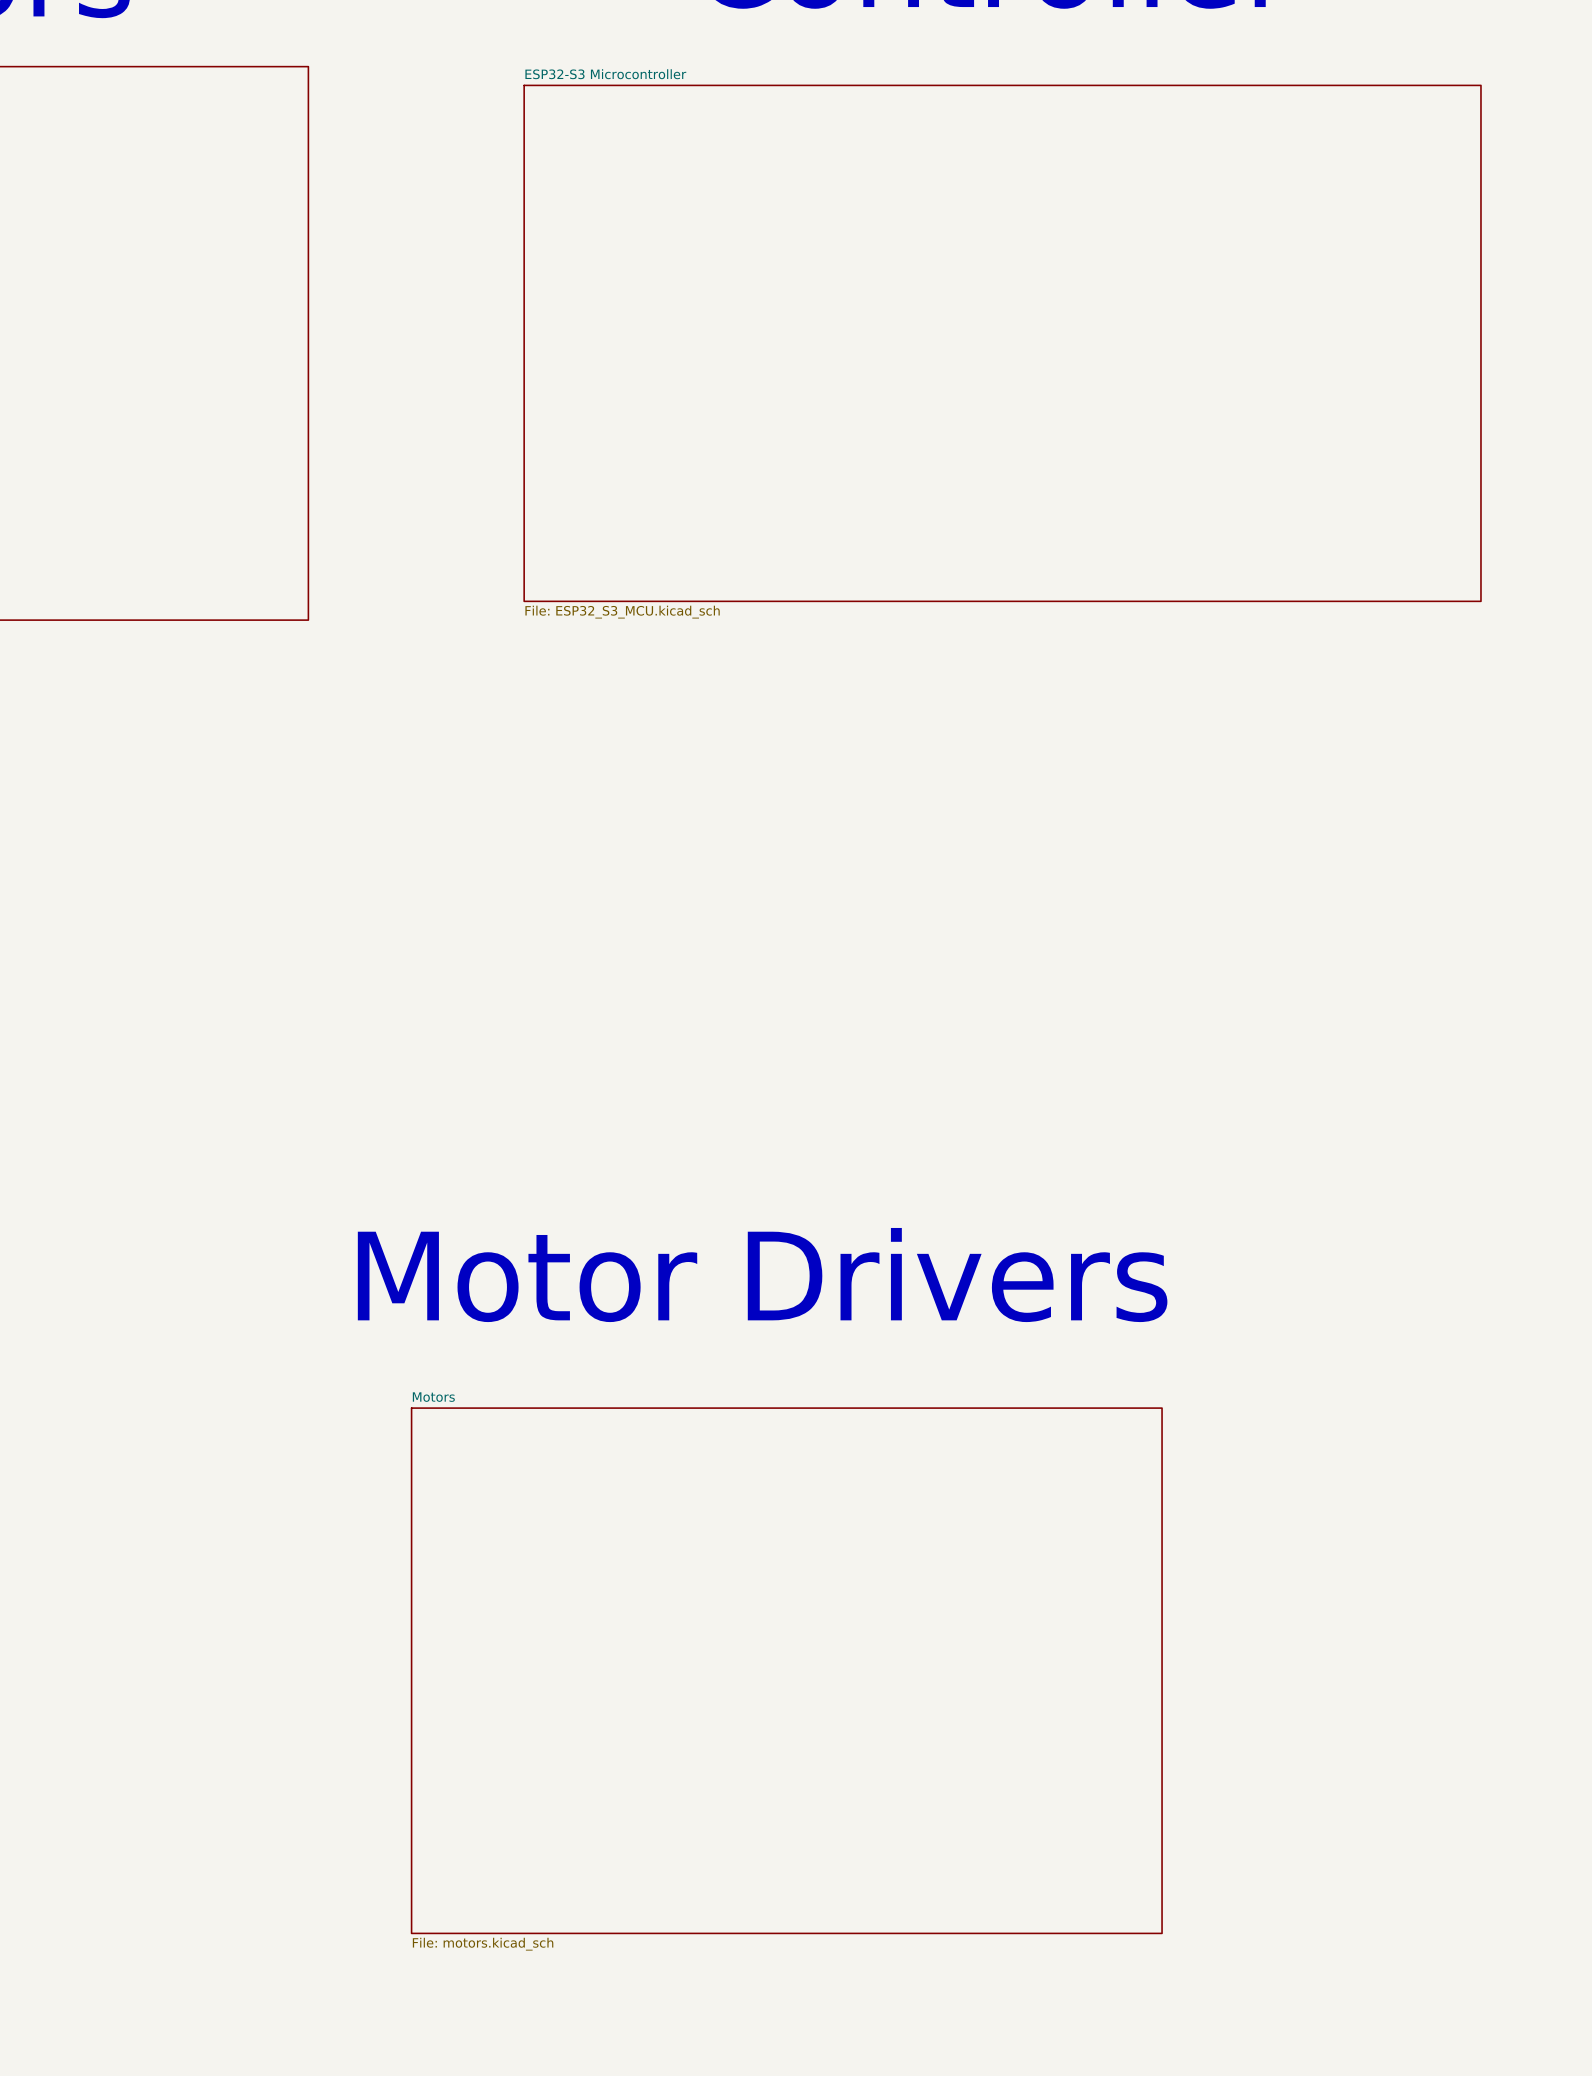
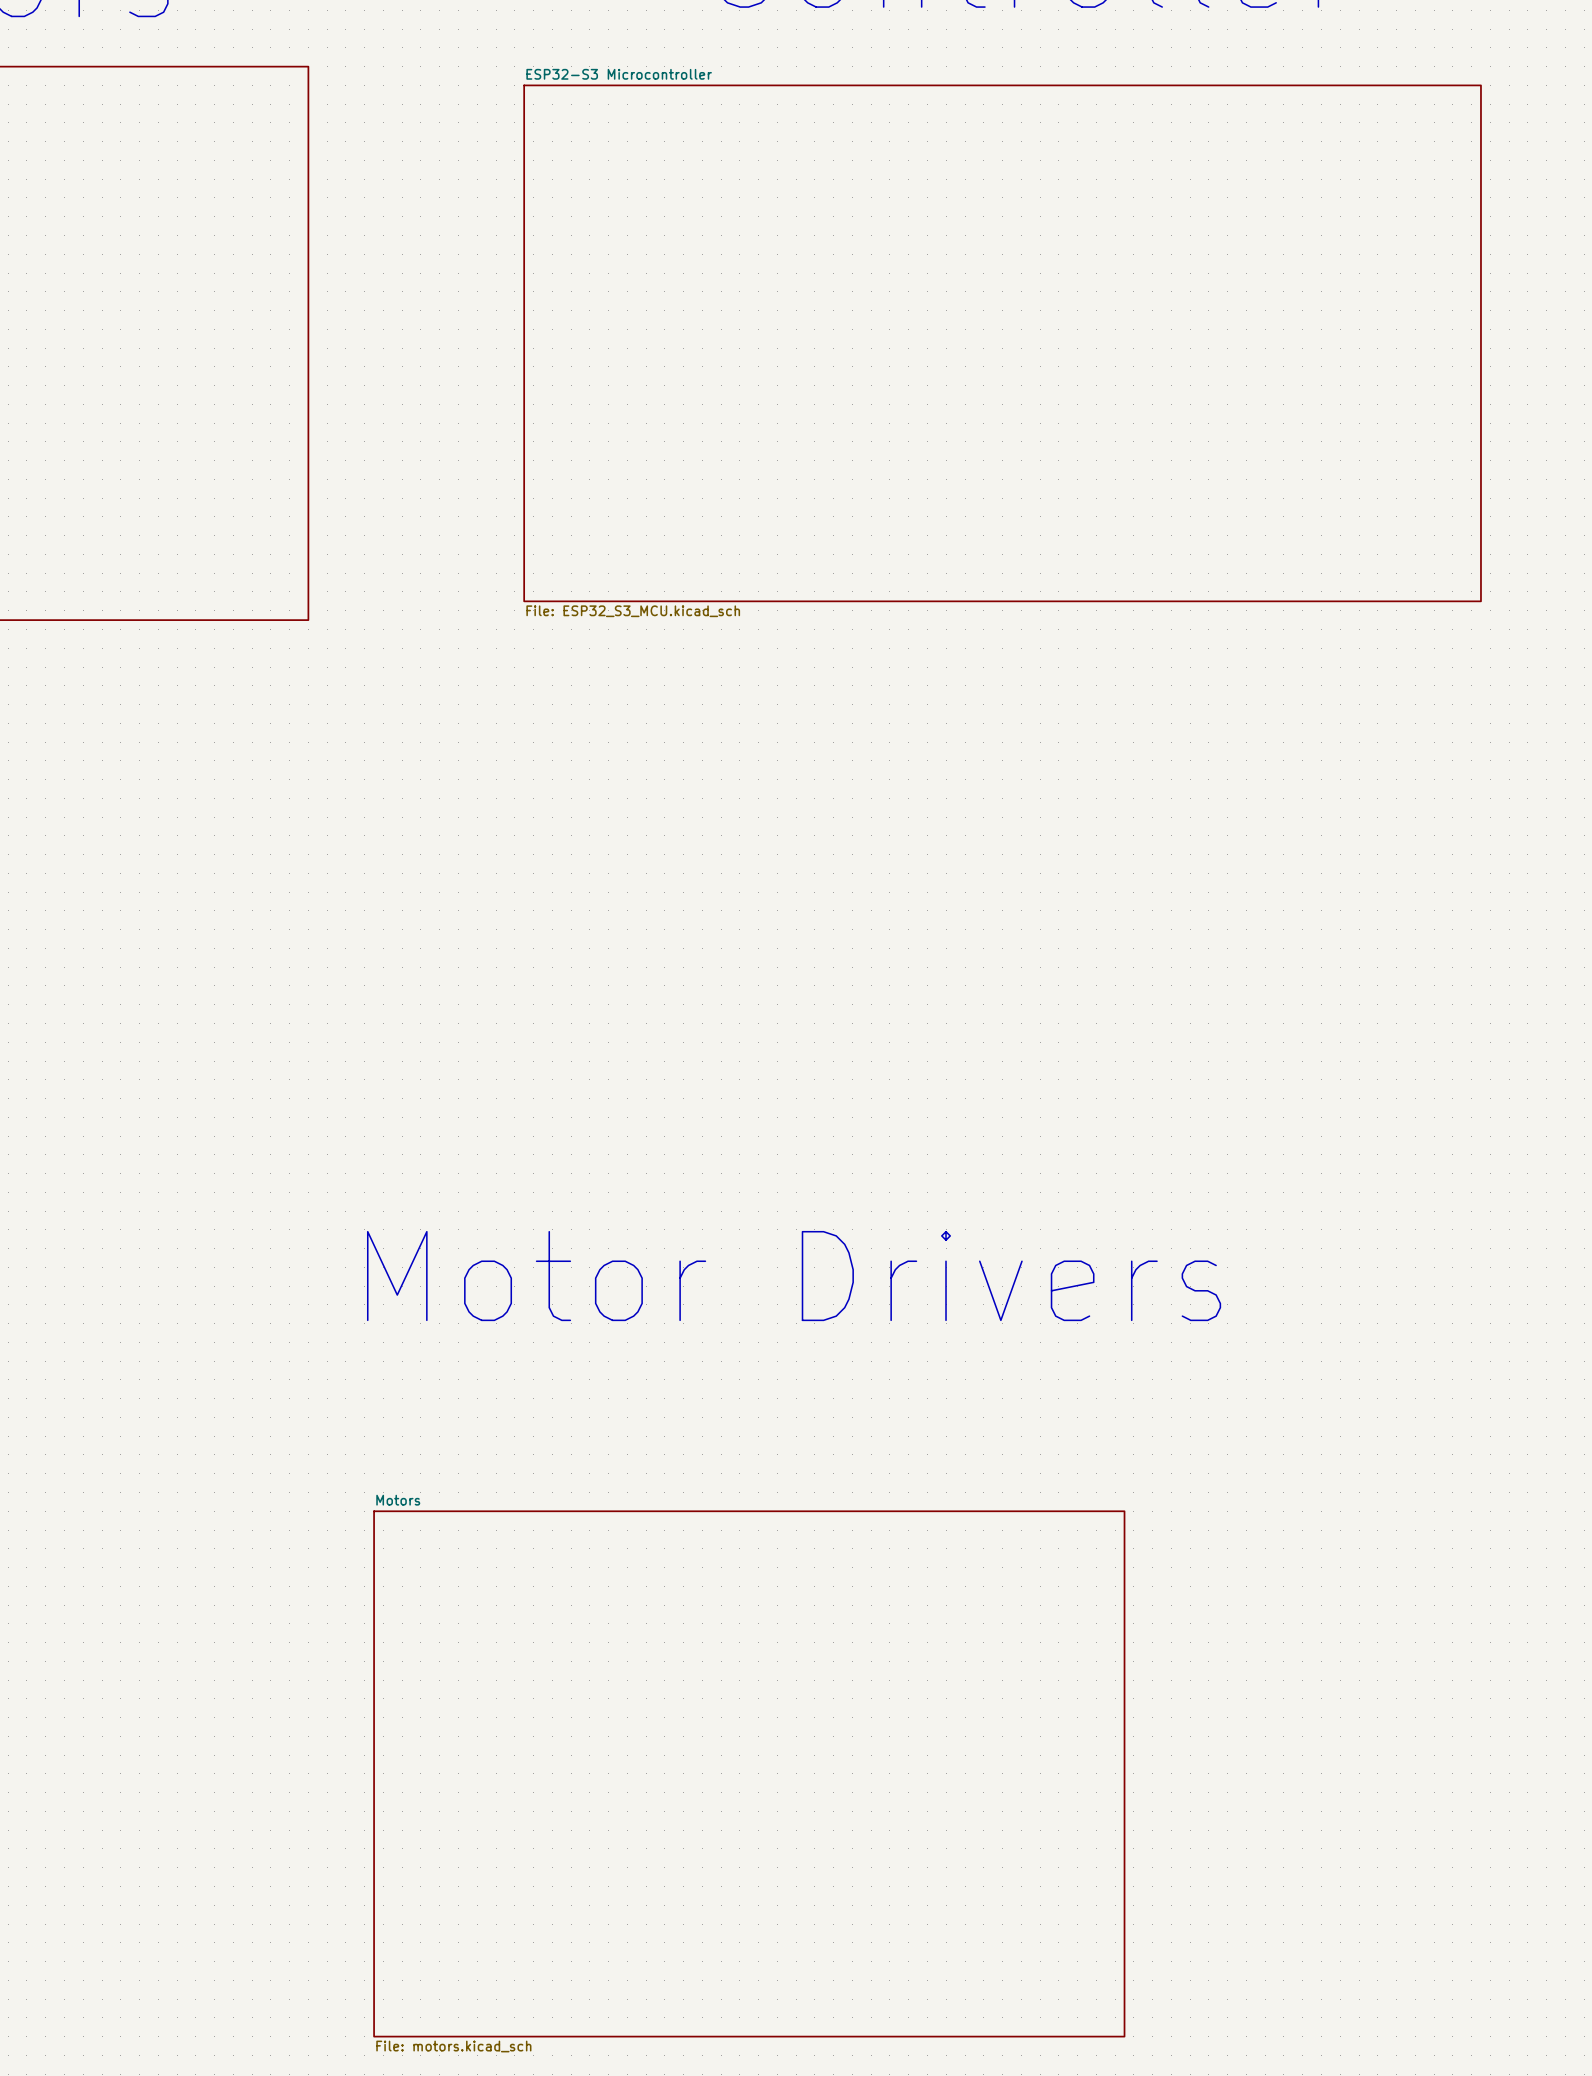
sheet Motors position: (786, 1670) -> (749, 1773)

